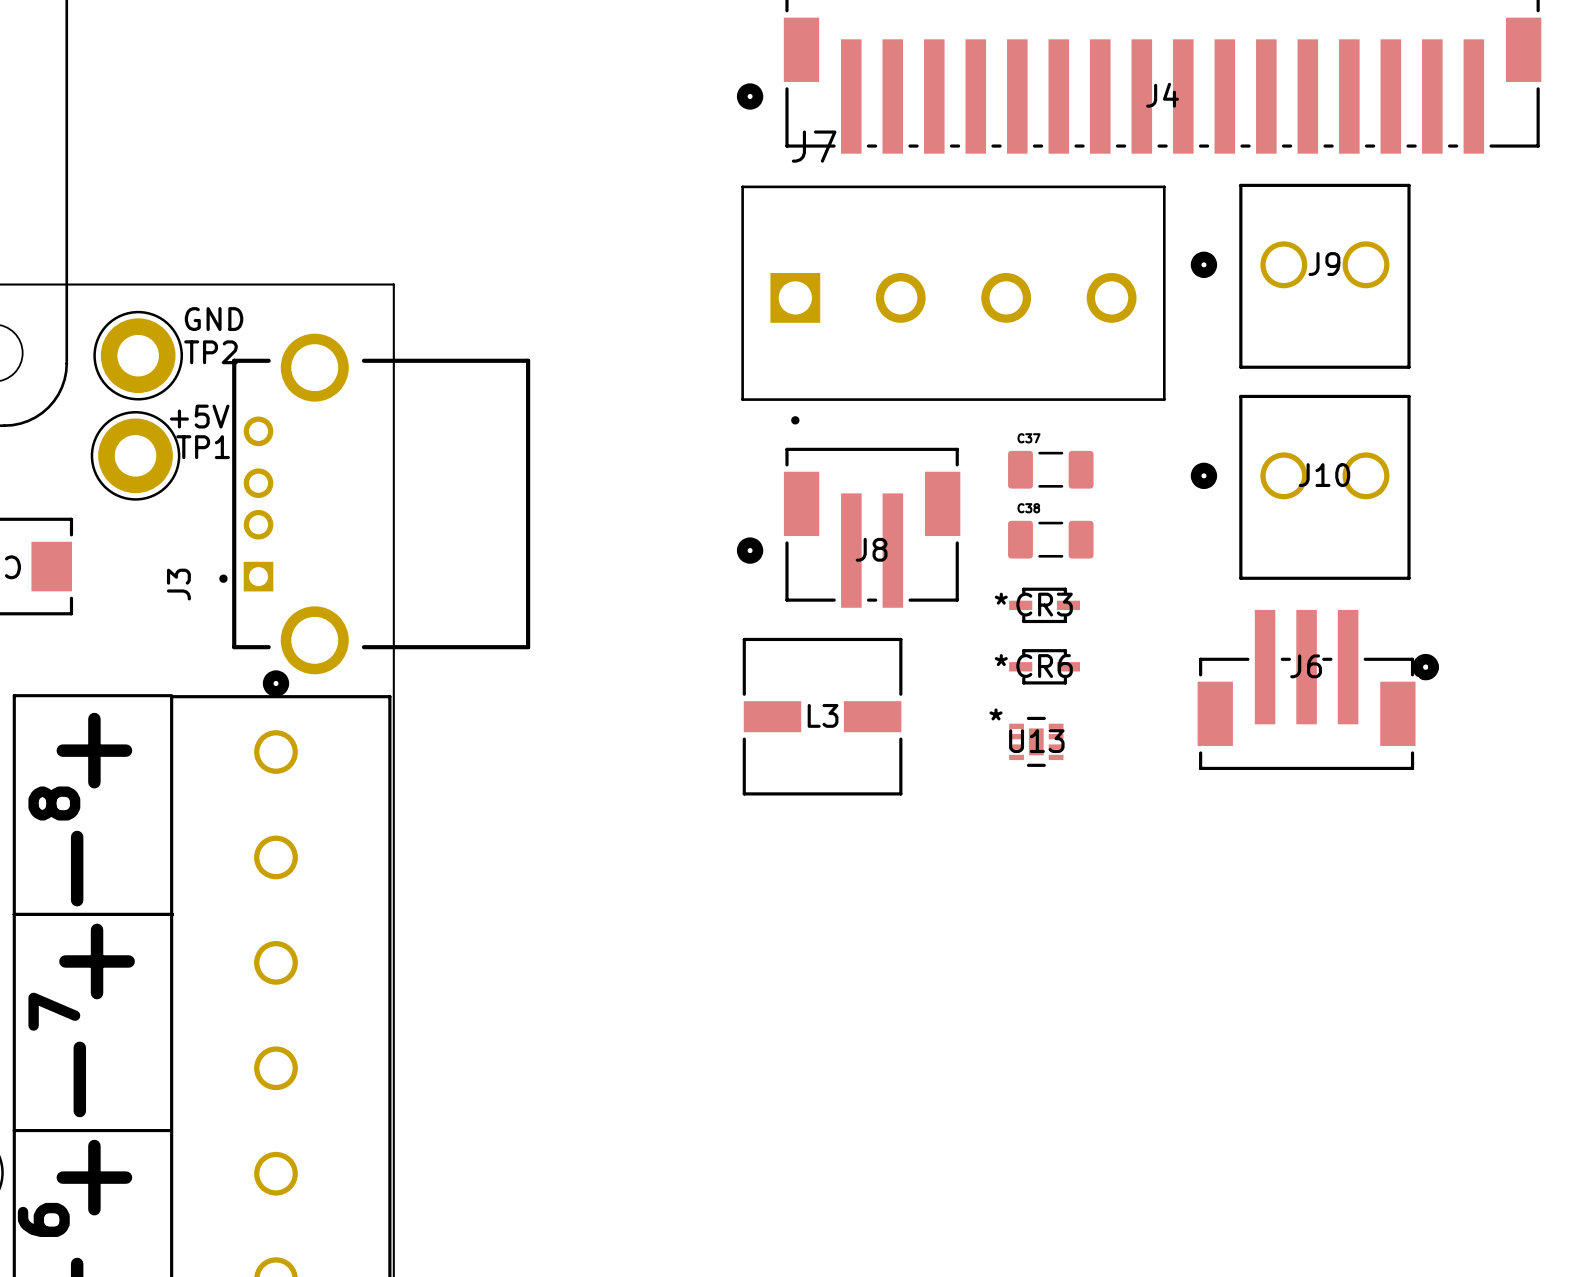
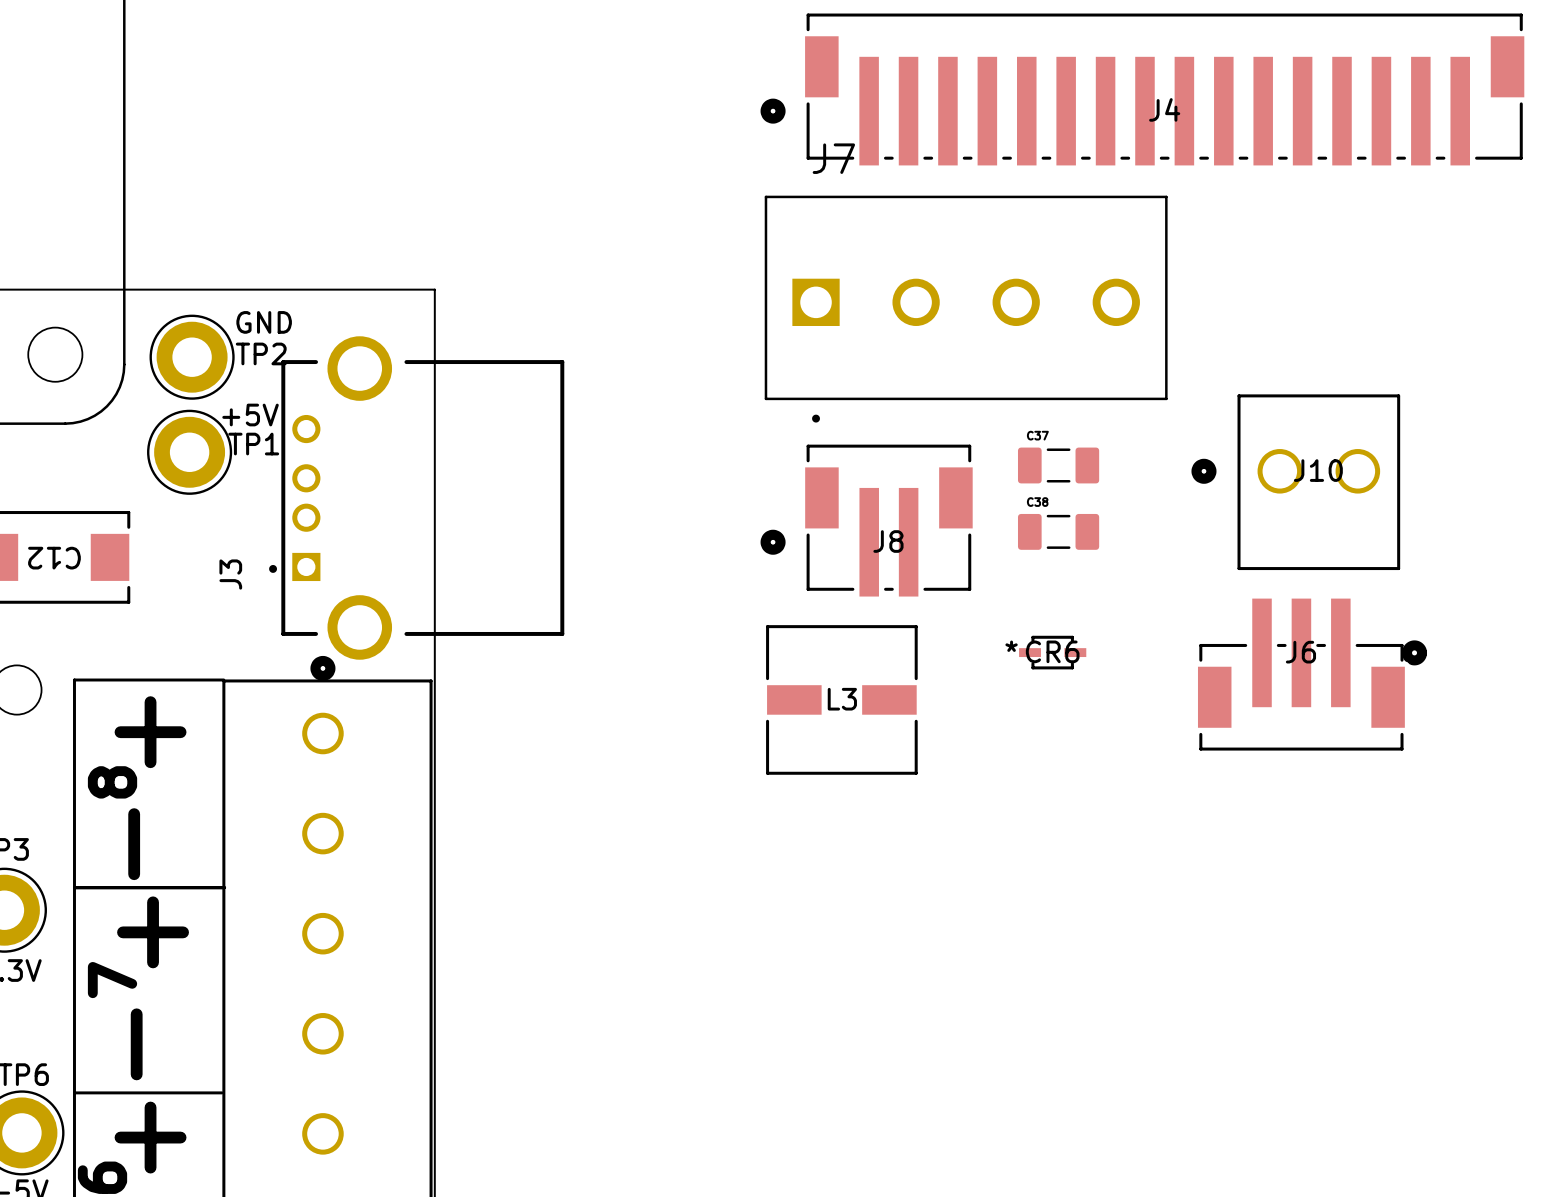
J9: (1300, 276) -> none
CR3: (1044, 605) -> none
U13: (1036, 741) -> none

